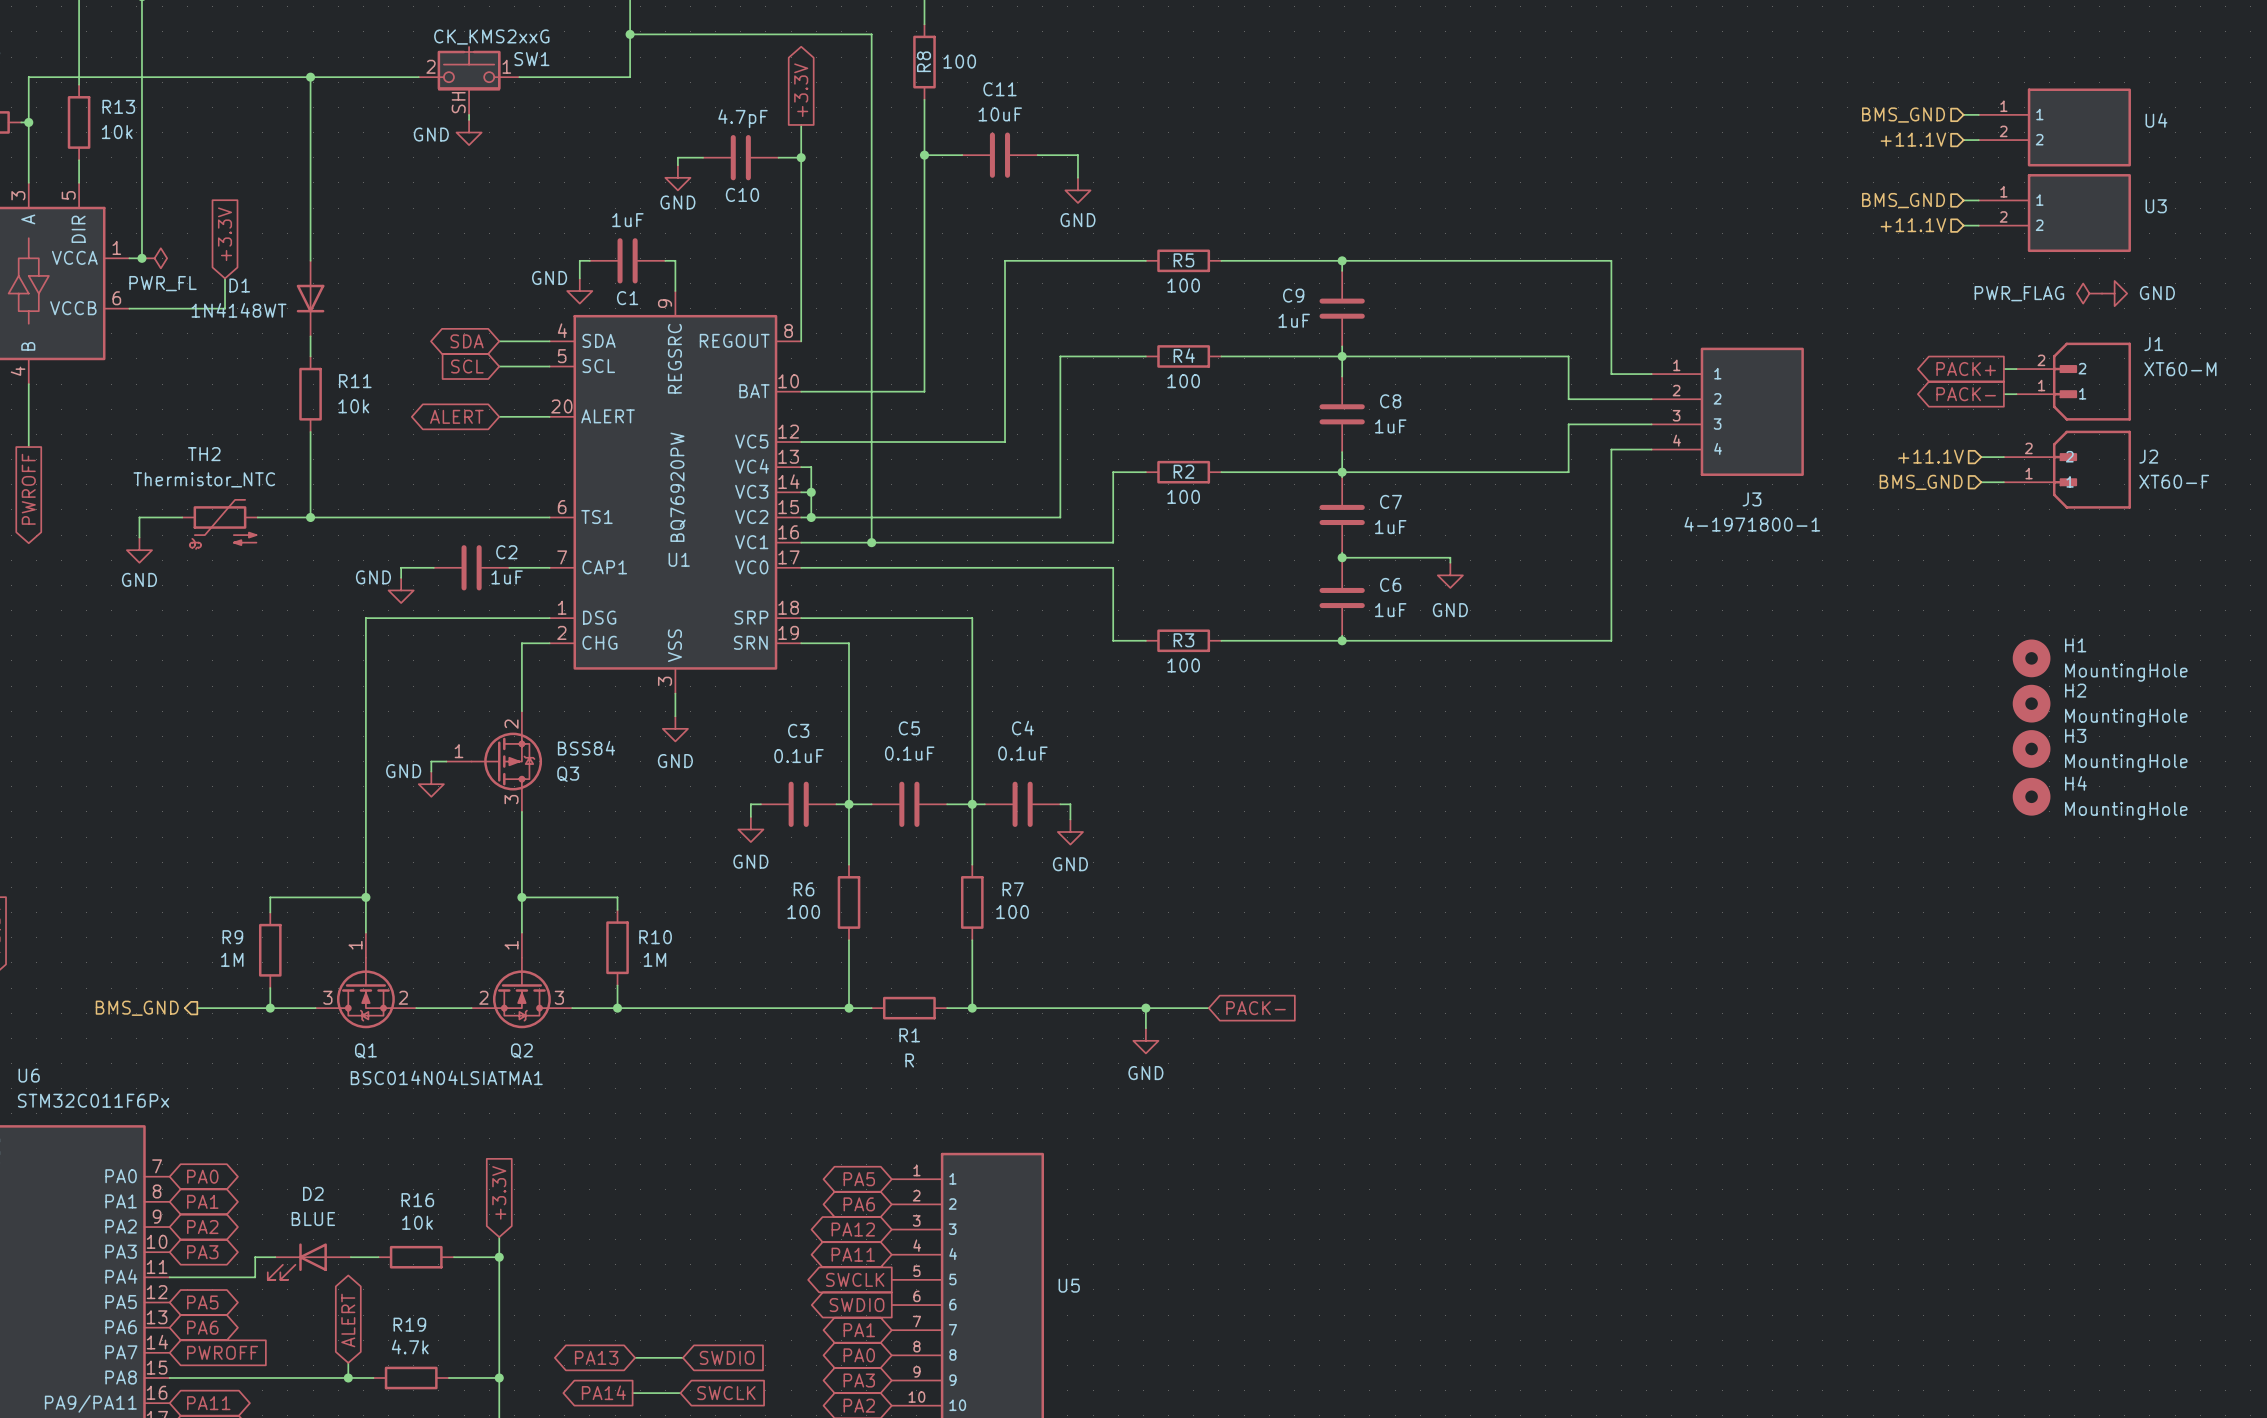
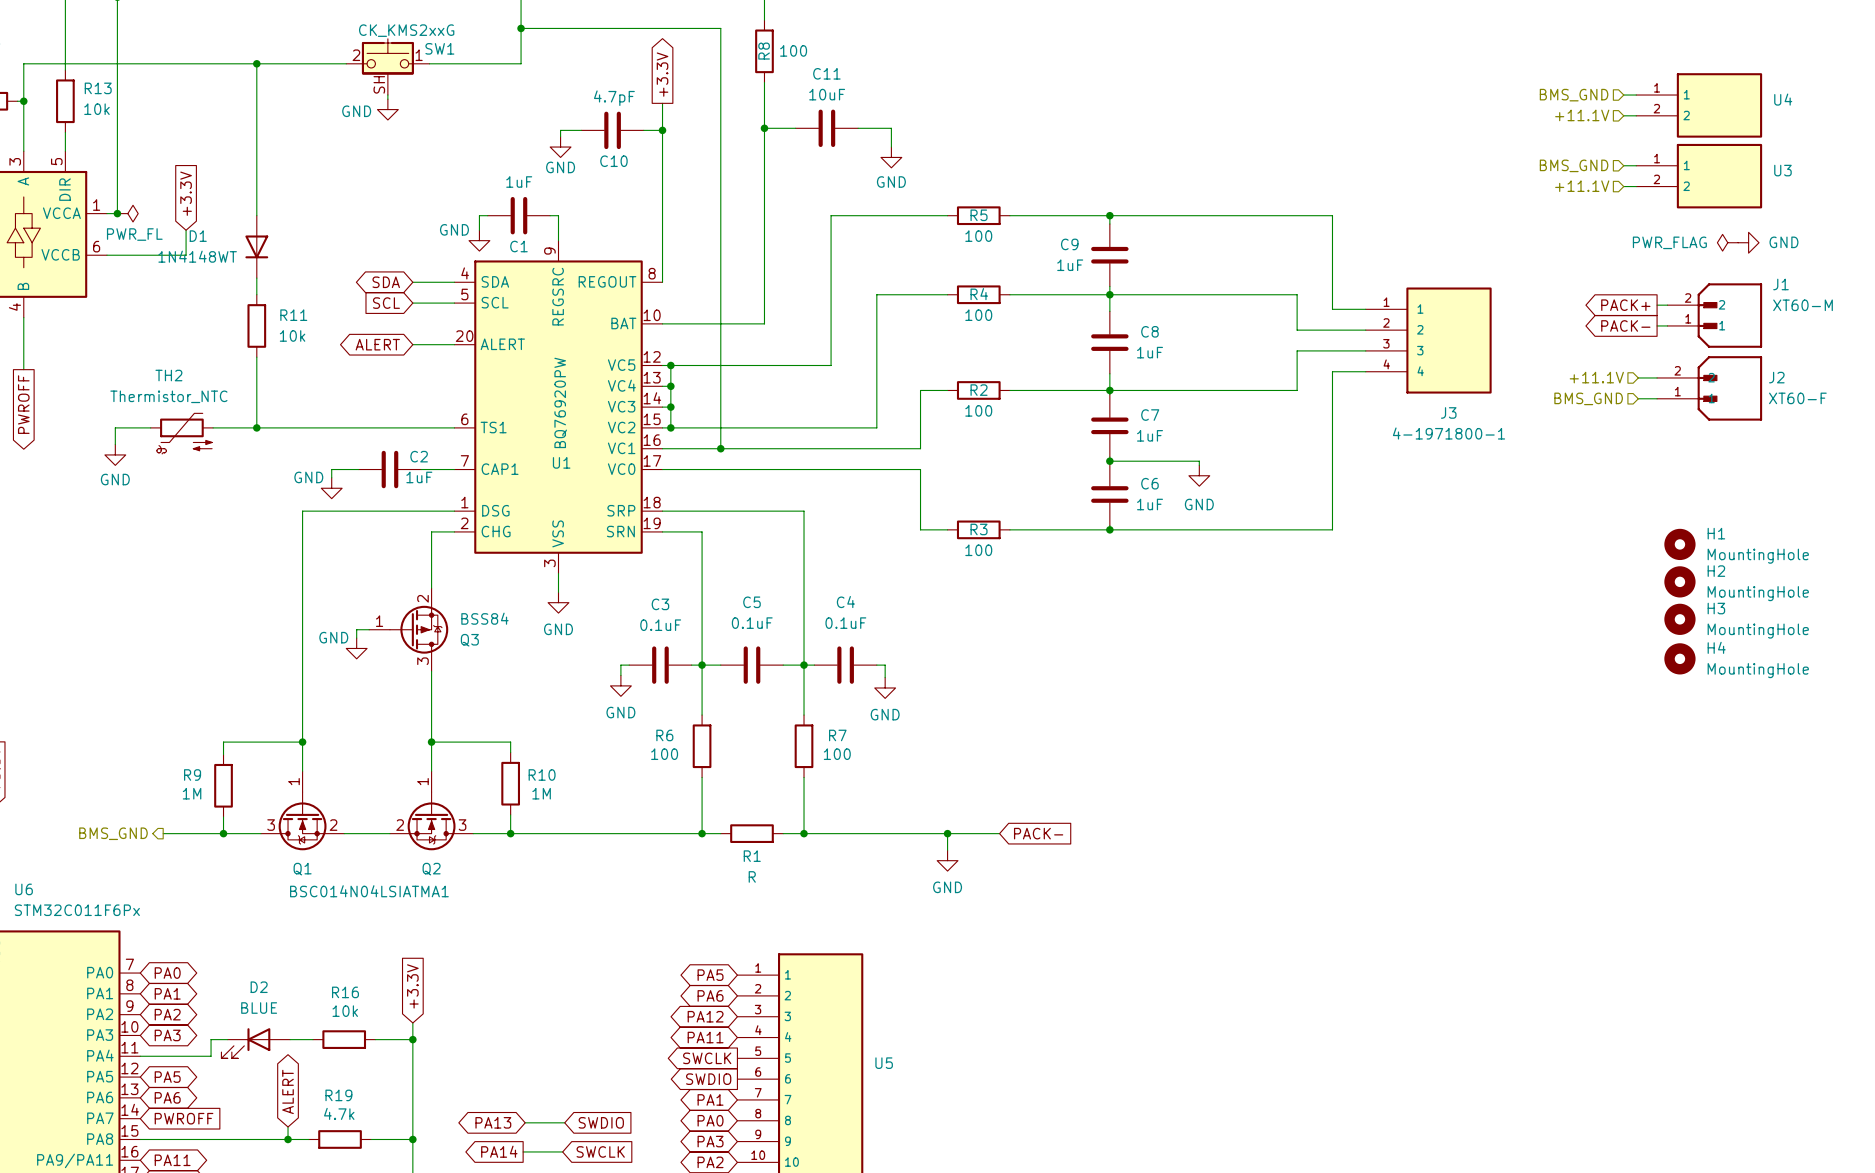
wire: none -> (670, 365) (670, 386)
junction: none -> (670, 365)
junction: none -> (670, 386)

